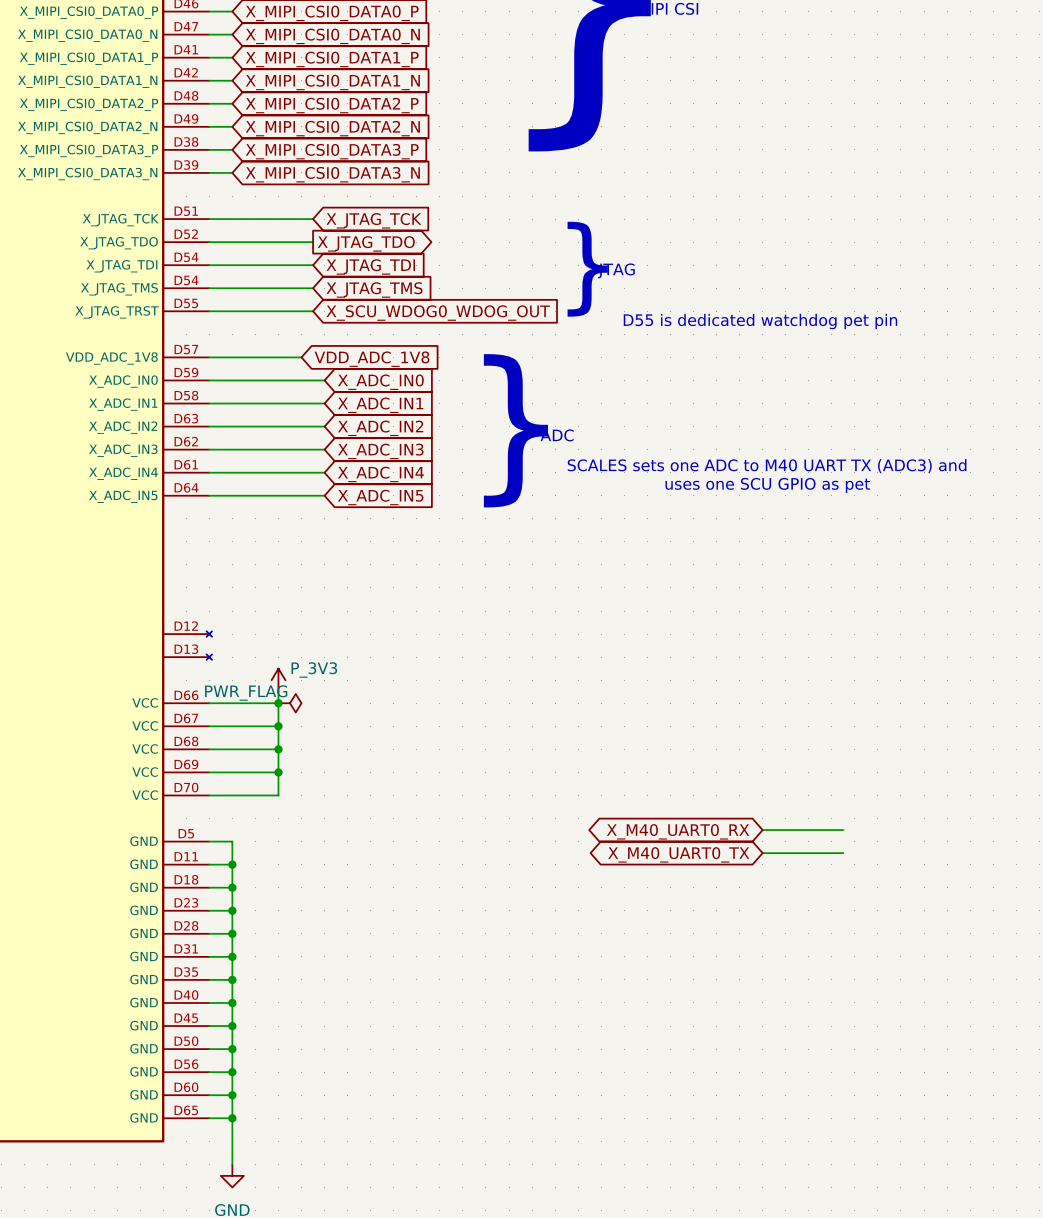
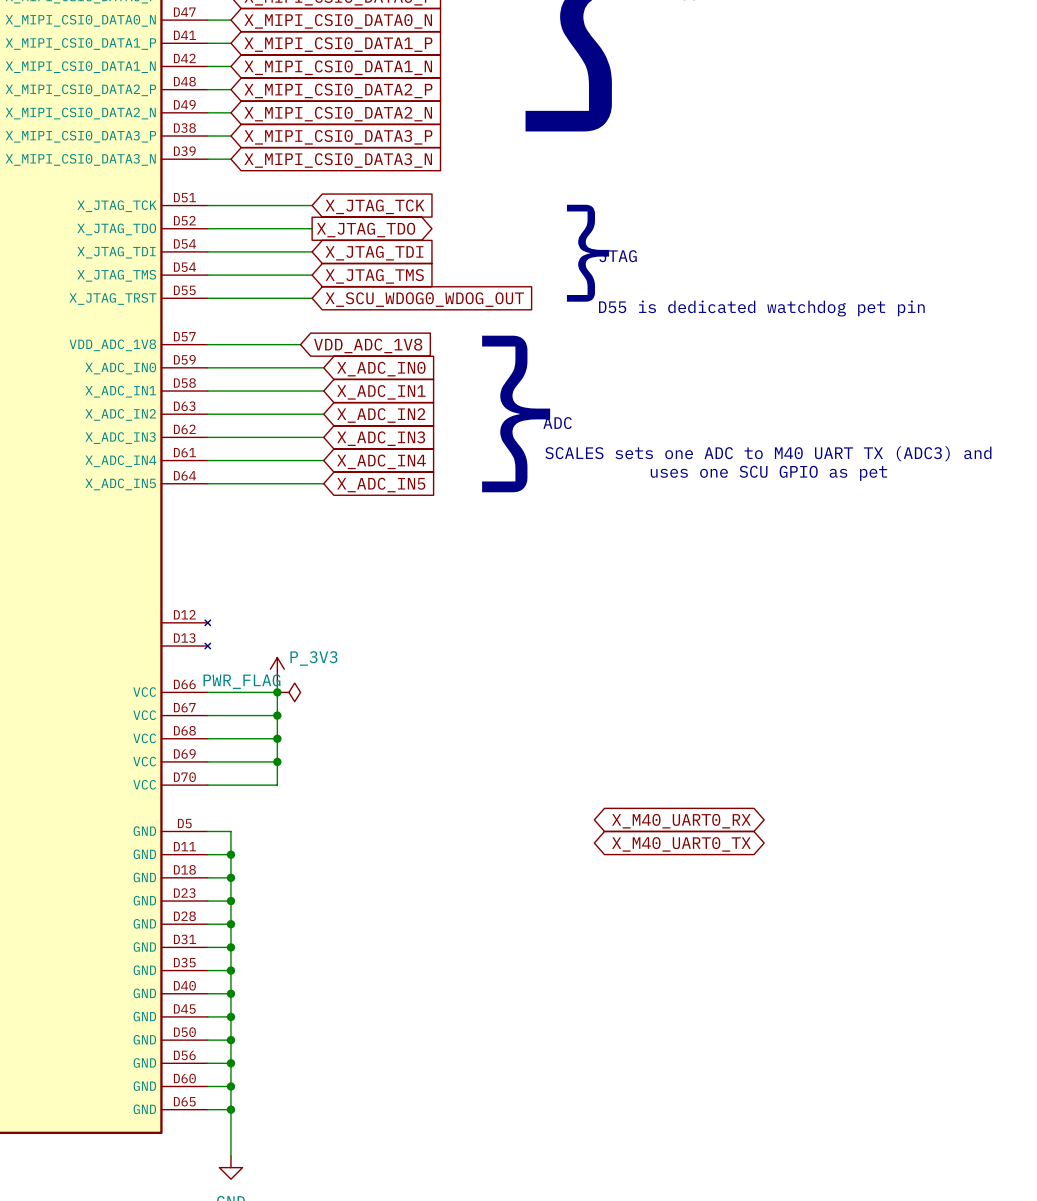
wire: (762, 830) (843, 830) -> none
wire: (762, 853) (843, 853) -> none

